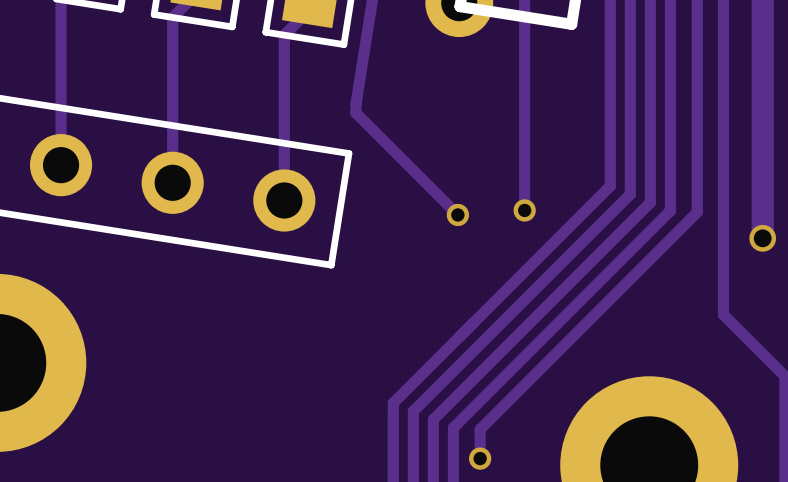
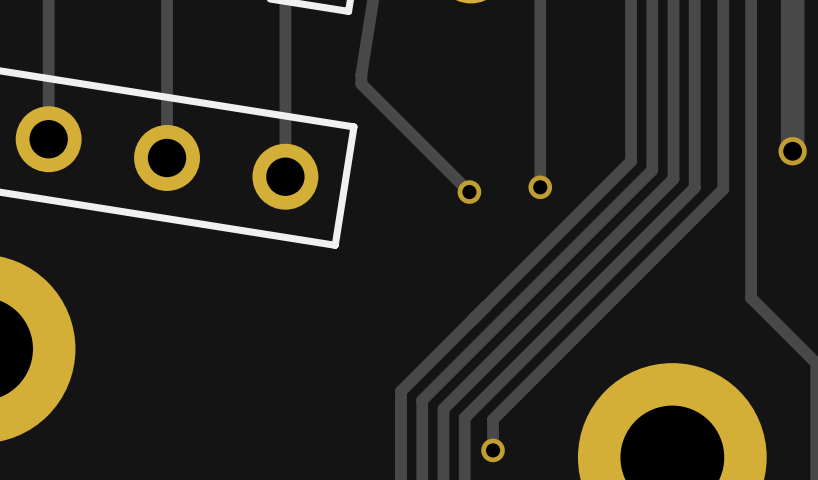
track: (762, 176) (762, 238) -> none
via position: (762, 238) -> (792, 151)

